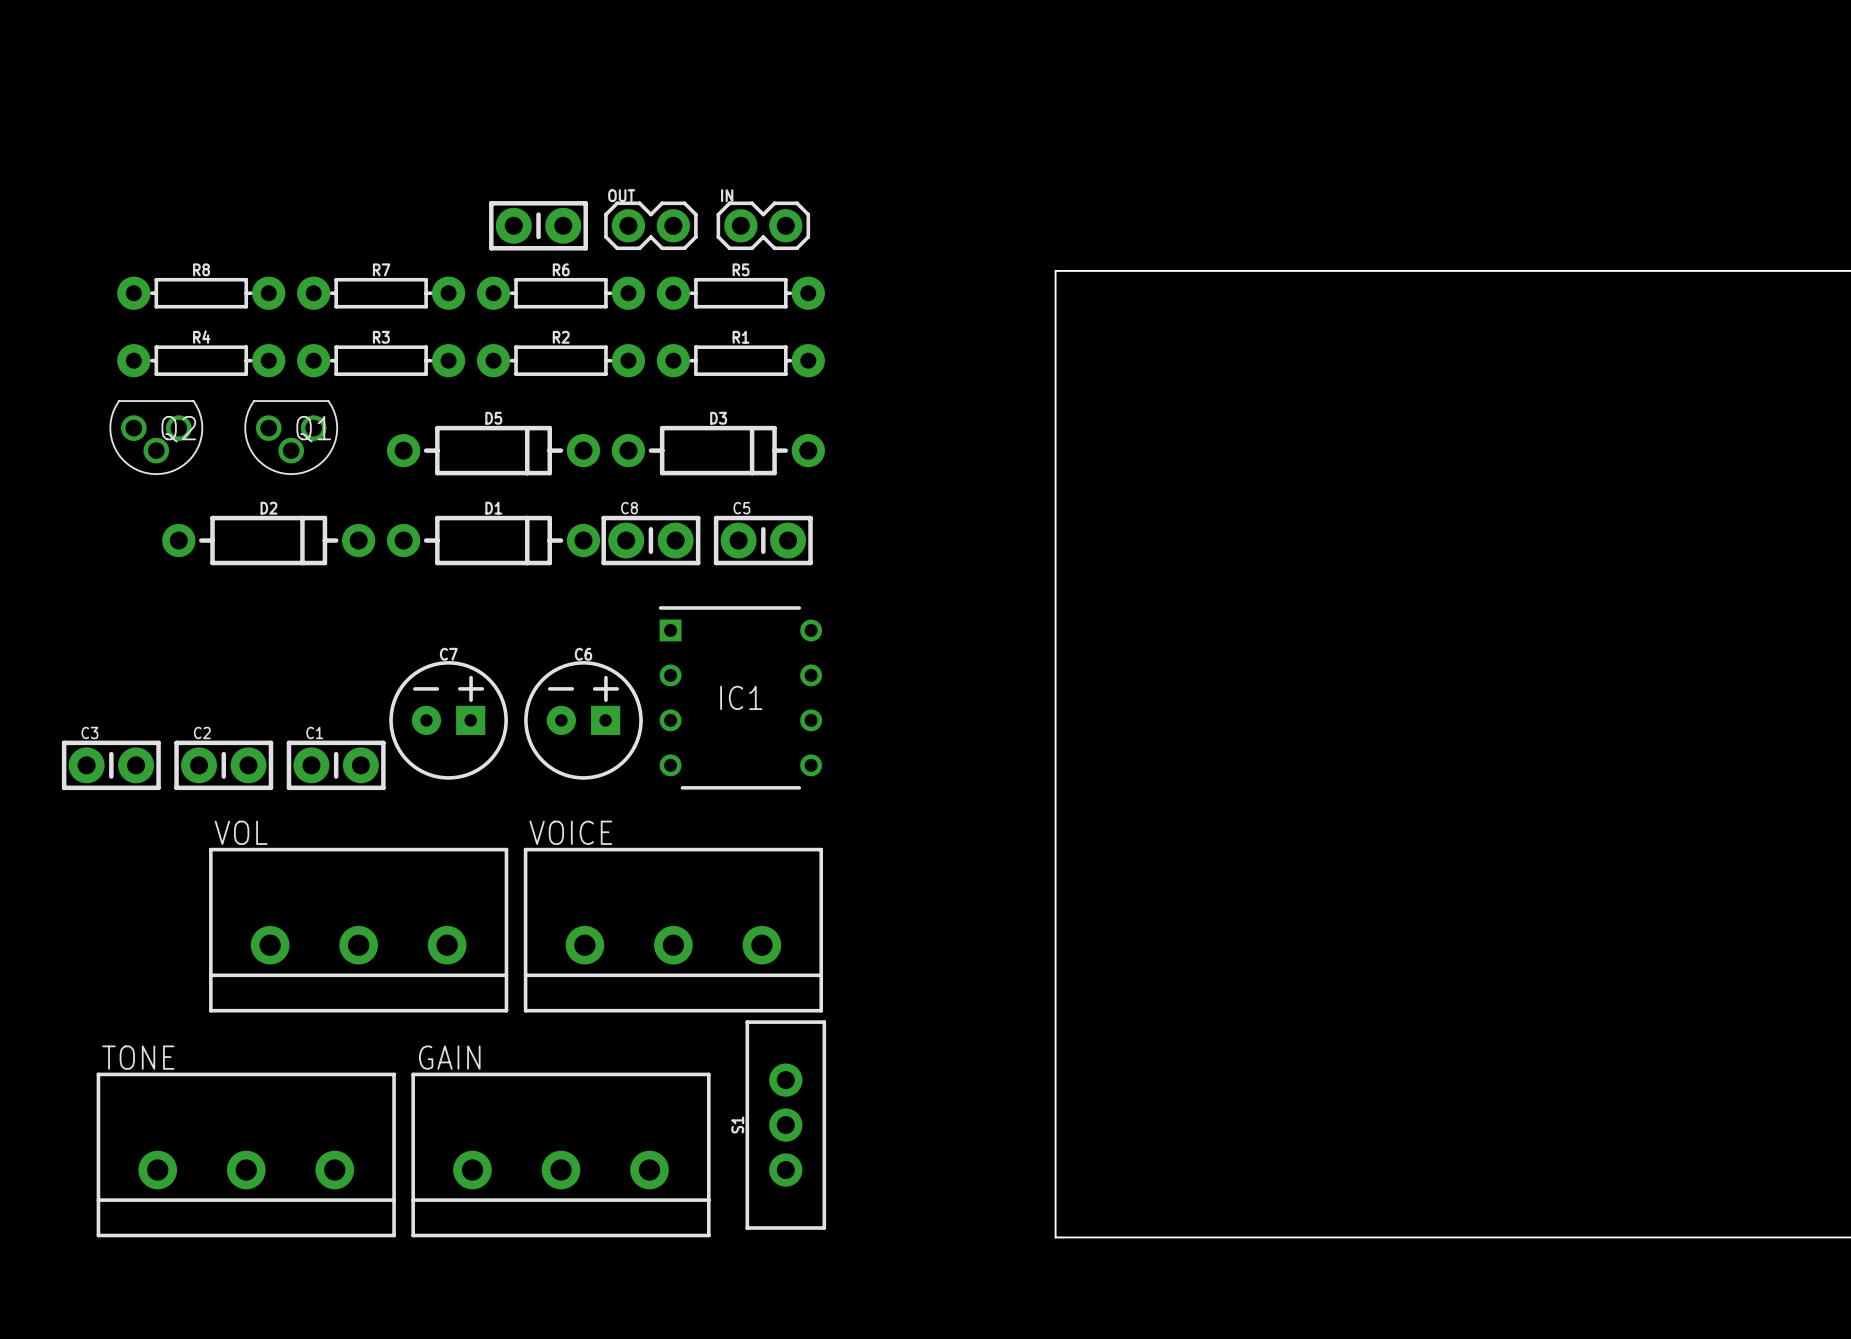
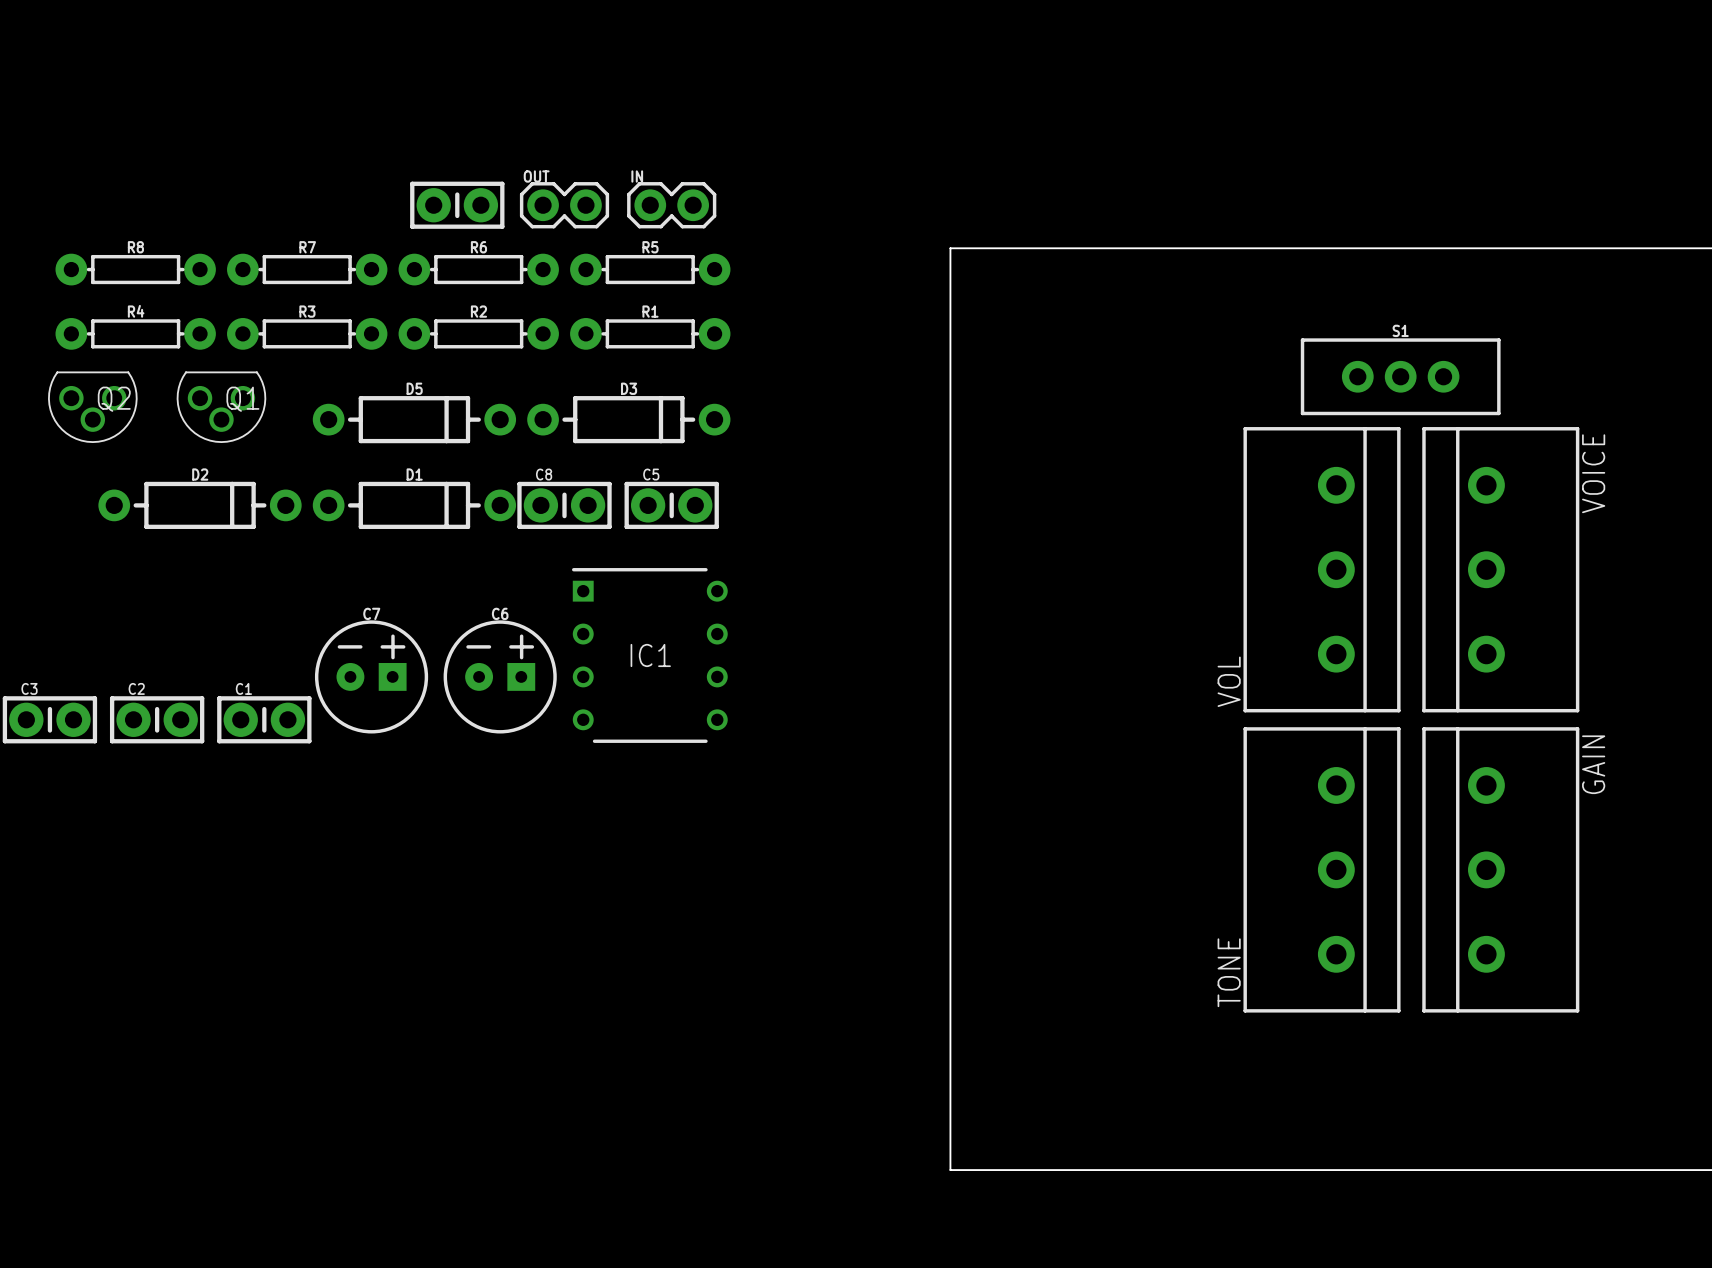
VOL: none -> (1322, 569)
VOICE: none -> (1500, 569)
TONE: none -> (1322, 869)
GAIN: none -> (1500, 869)
VOL: (358, 930) -> none
VOICE: (673, 930) -> none
S1 rotation: 0° (785, 1125) -> 90° clockwise (1400, 376)
S1 position: (785, 1125) -> (1400, 376)
TONE: (246, 1154) -> none
GAIN: (560, 1154) -> none

